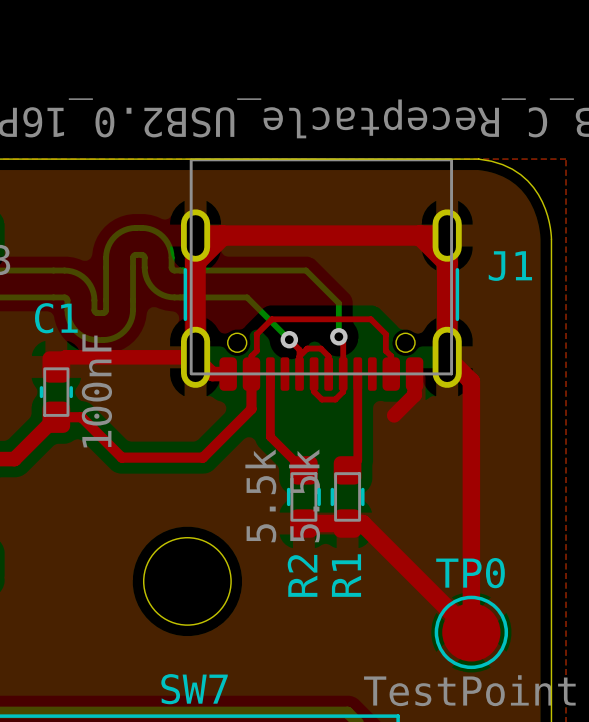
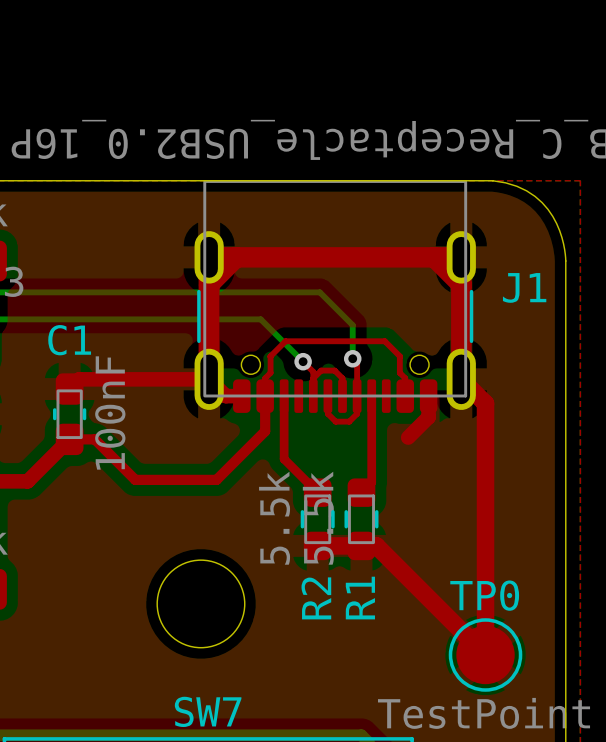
bottom track: (64, 270) (76, 272) (85, 279) (93, 292) (94, 311) (104, 312) (106, 257) (108, 246) (117, 234) (124, 230) (135, 227) (149, 228) (162, 236) (169, 246) (171, 268) (174, 270) -> (77, 292) (188, 292)
bottom track: (64, 297) (67, 299) (68, 317) (73, 328) (85, 337) (97, 340) (107, 339) (118, 336) (124, 331) (130, 321) (133, 310) (133, 257) (134, 255) (144, 256) (145, 275) (153, 288) (163, 295) (174, 297) -> (77, 319) (188, 319)

